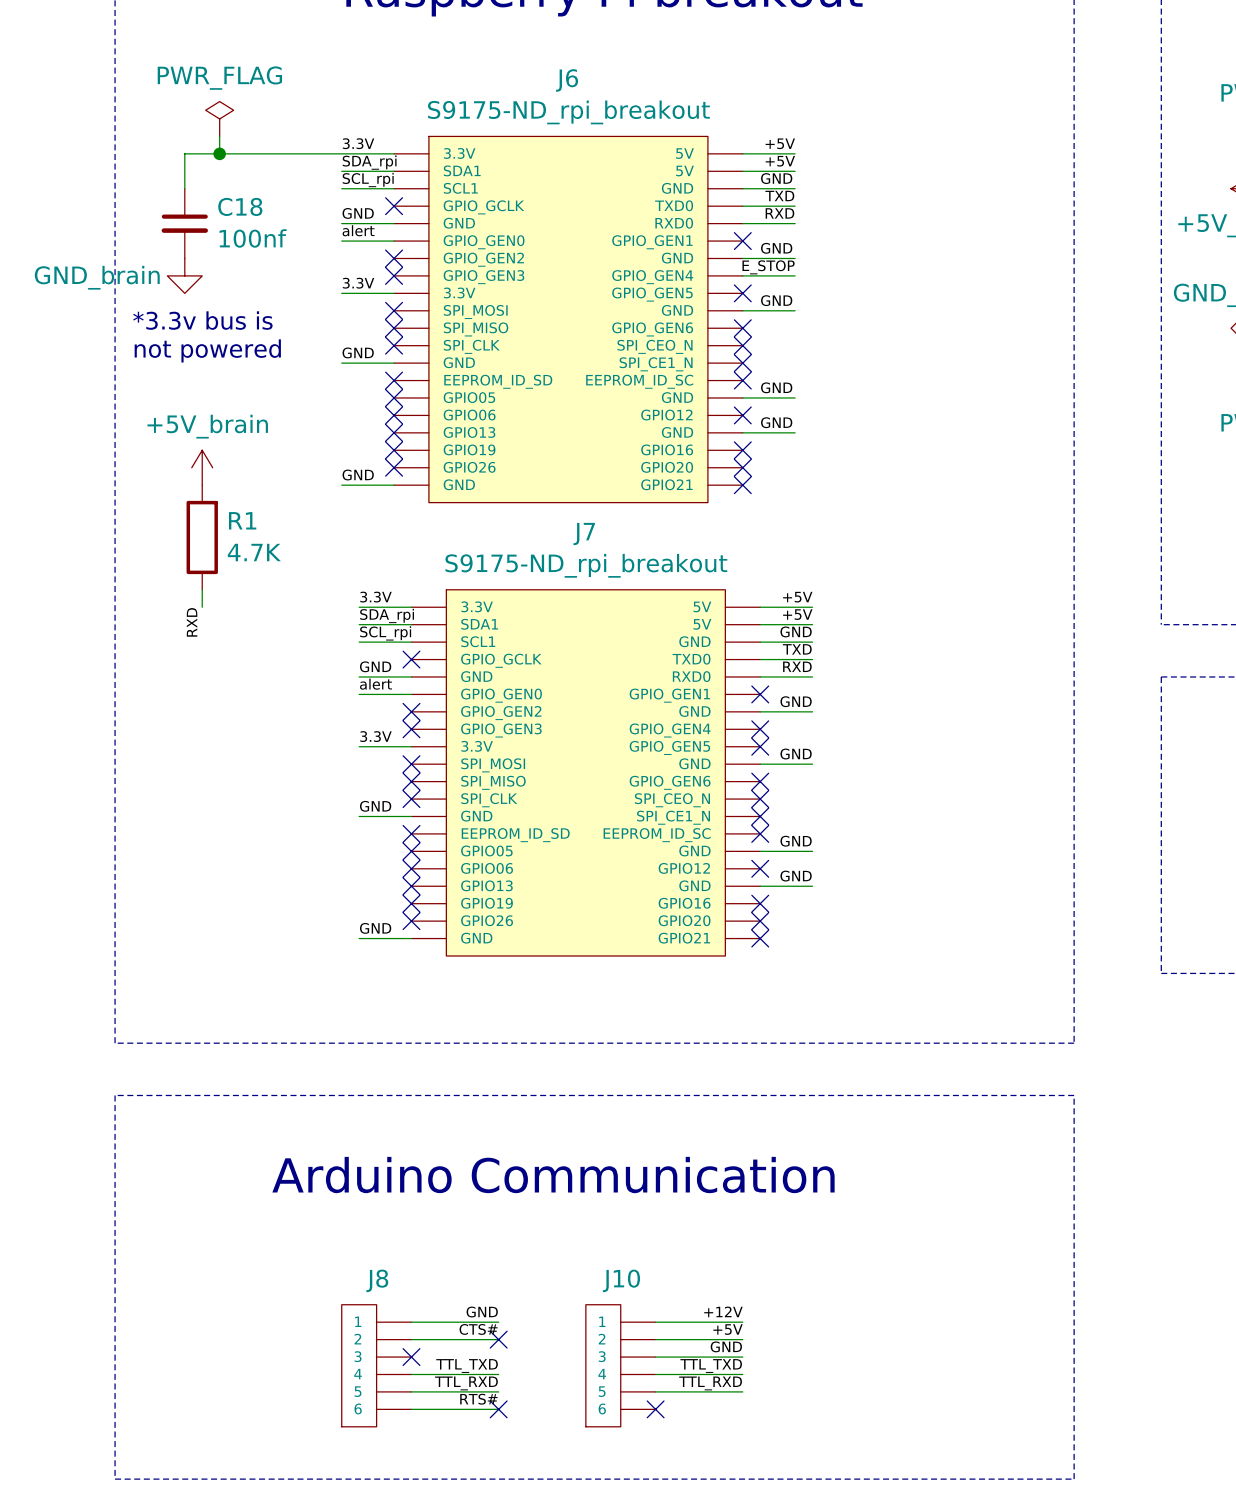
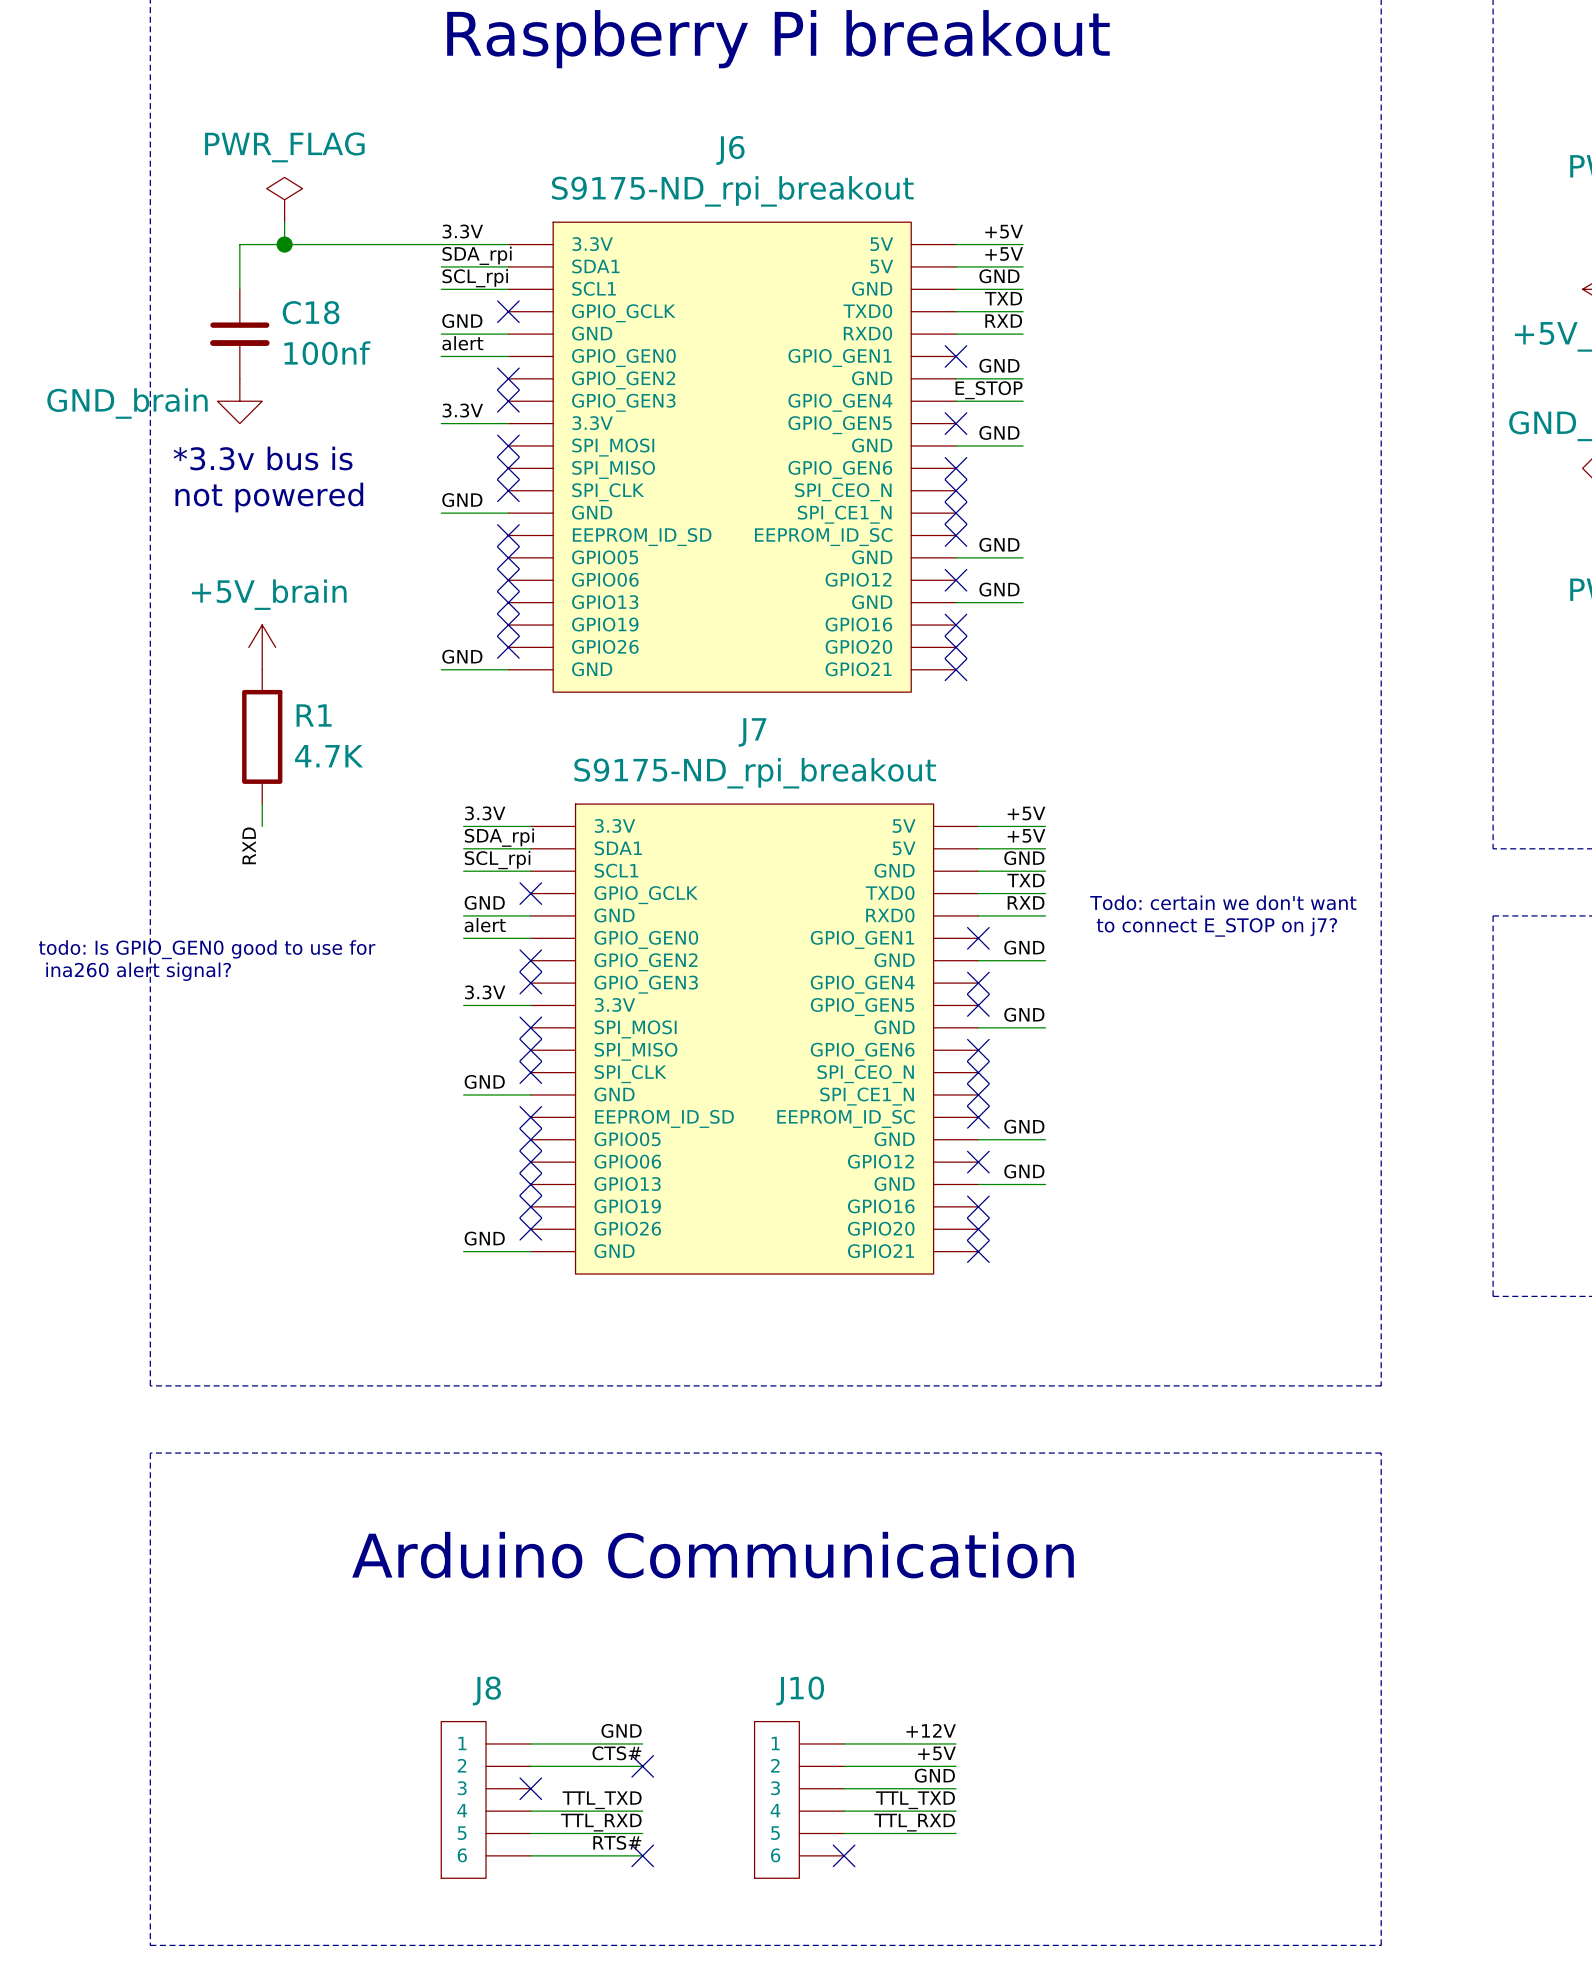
text: none -> Todo: certain we don't want (1223, 902)
text: none -> to connect E_STOP on j7? (1216, 927)
text: none -> todo: Is GPIO_GEN0 good to use for (207, 949)
text: none -> ina260 alert signal? (138, 971)

